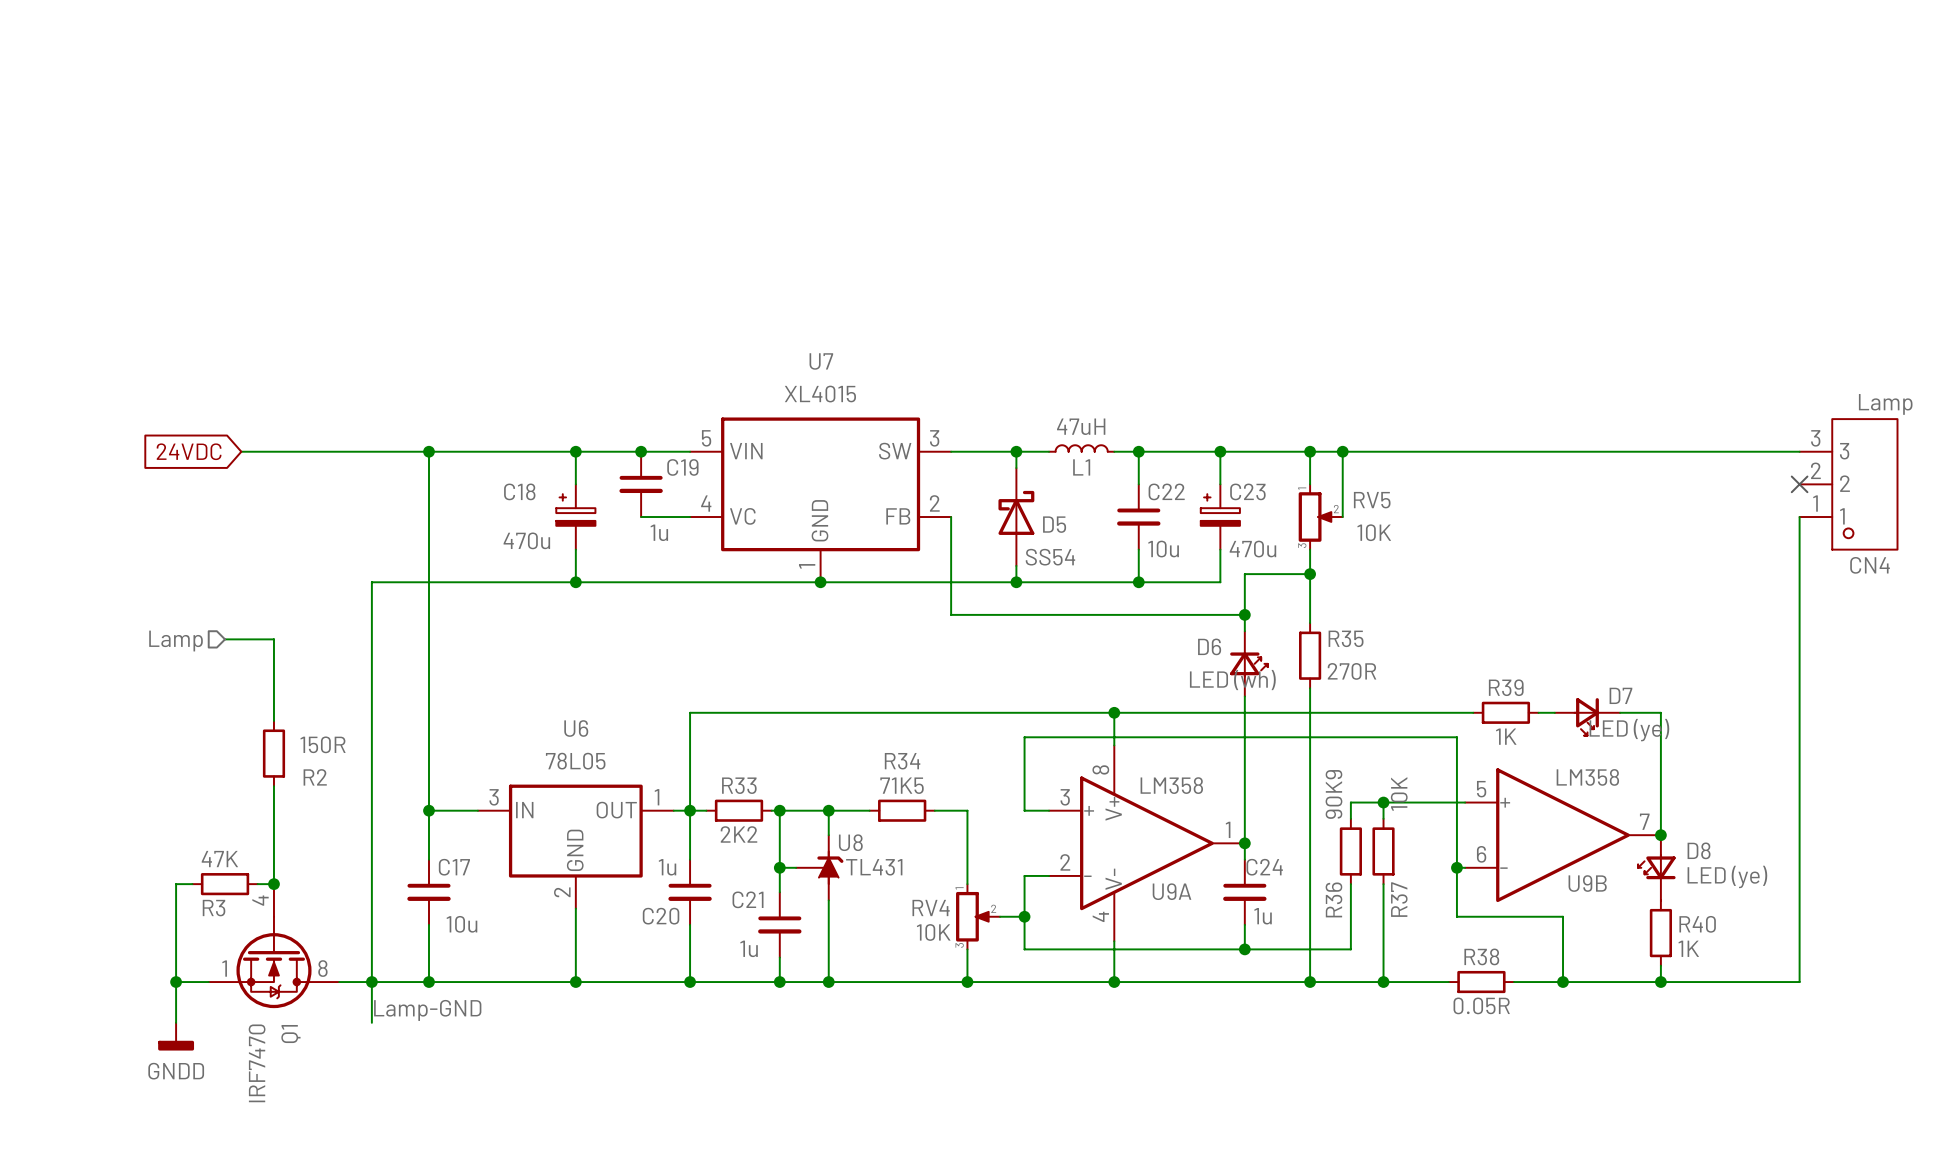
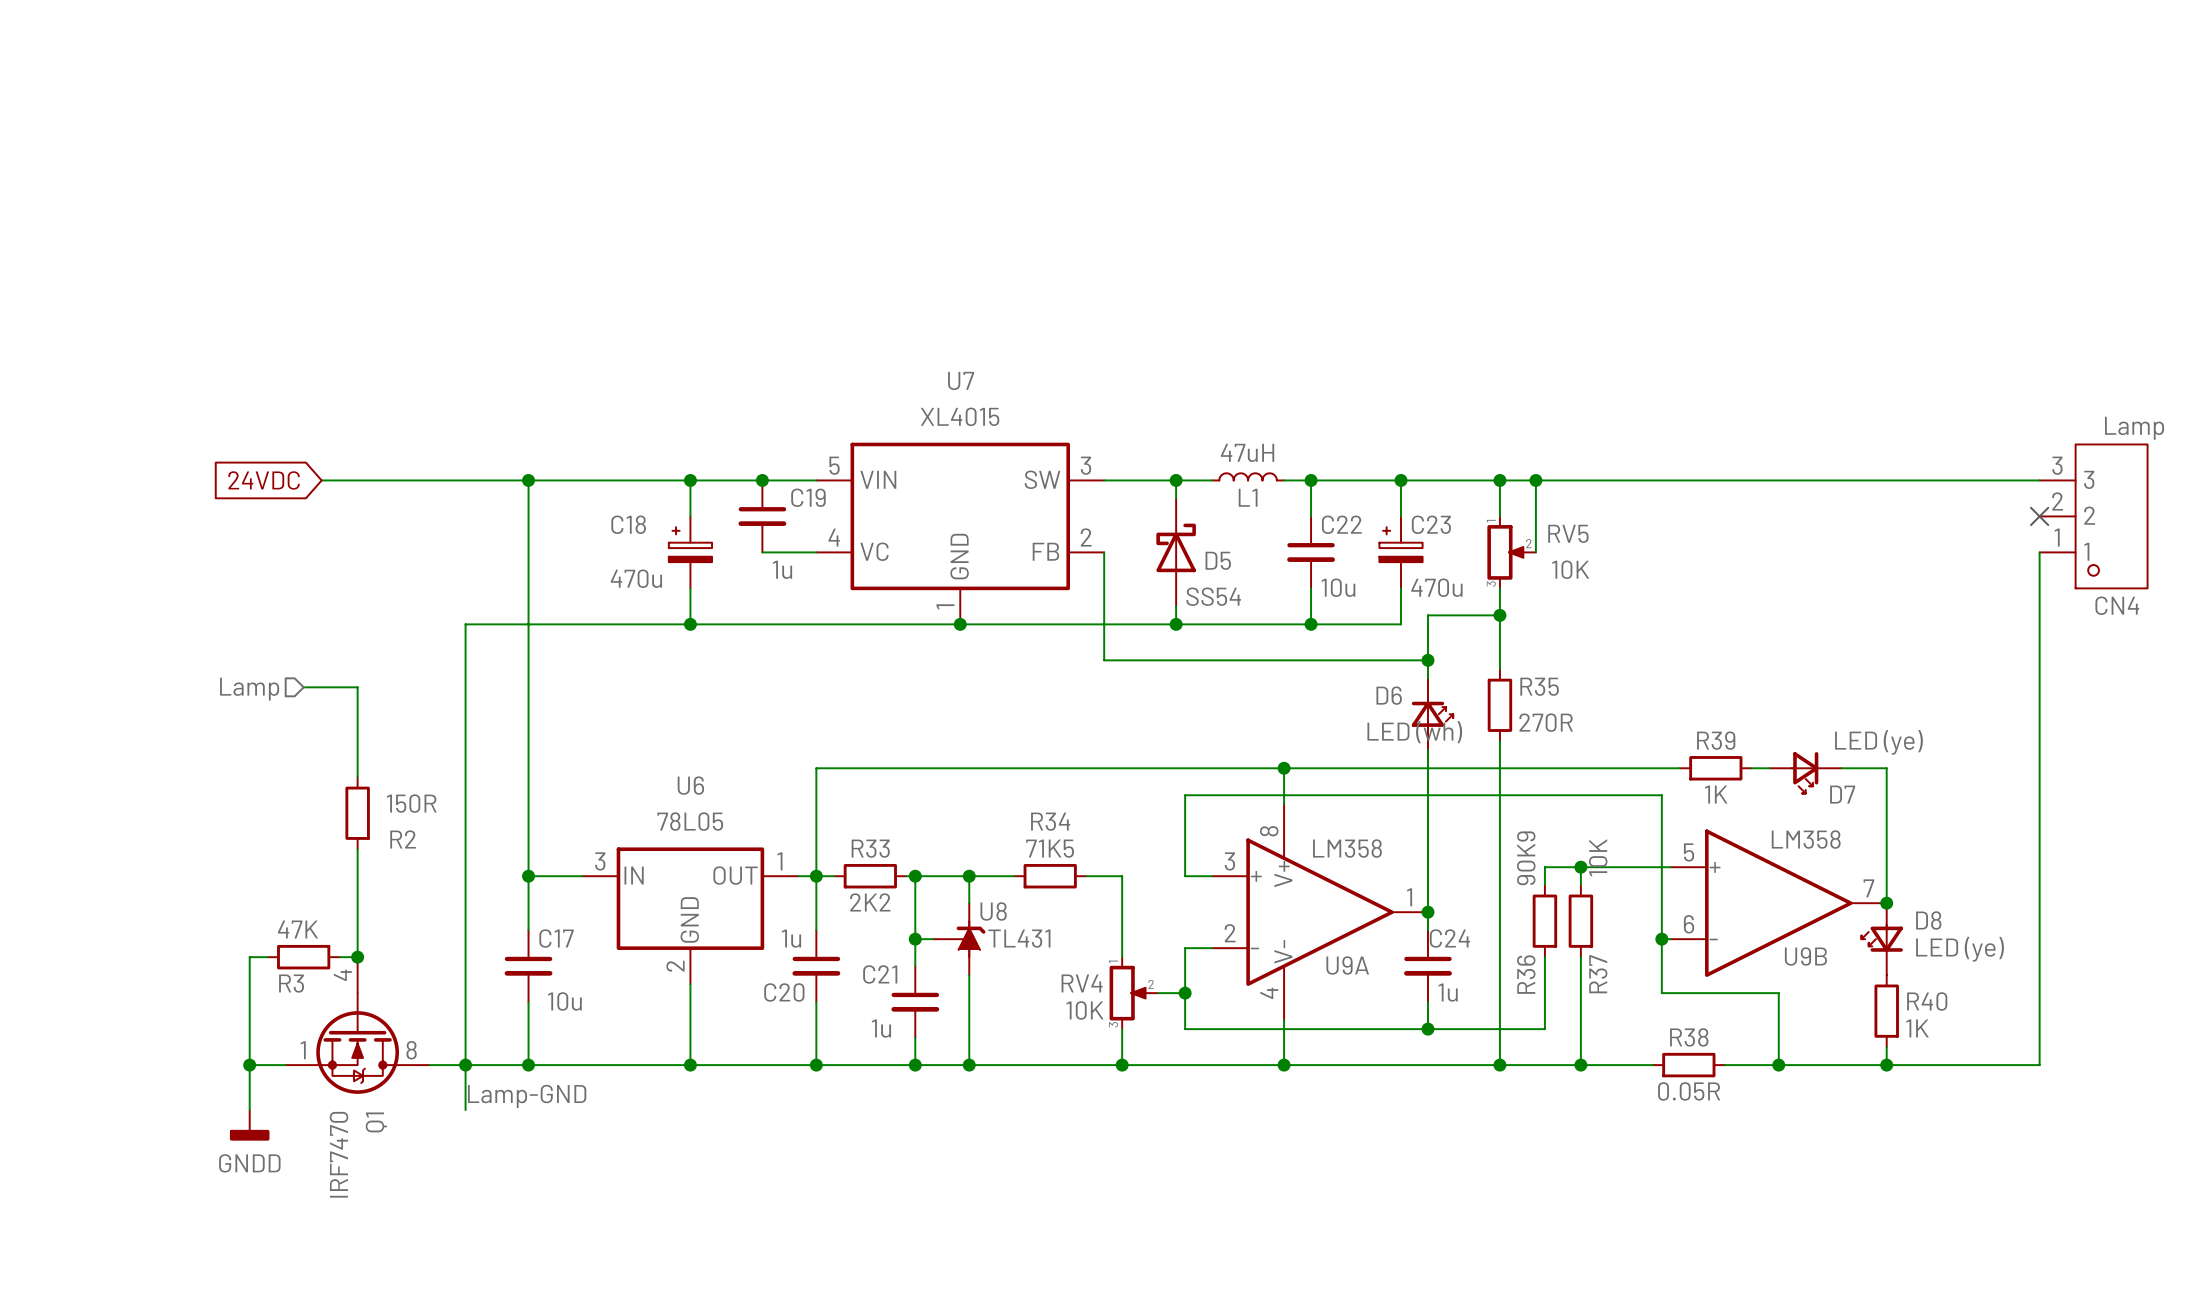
D7 name position: D7 (1620, 695) -> D7 (1842, 794)
D7 value position: LED (ye) (1629, 730) -> LED (ye) (1878, 742)

